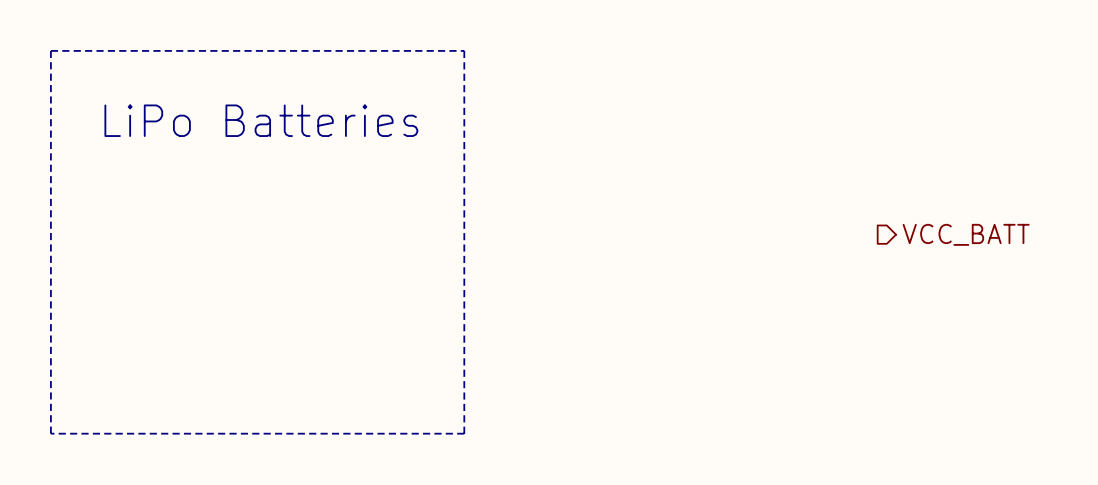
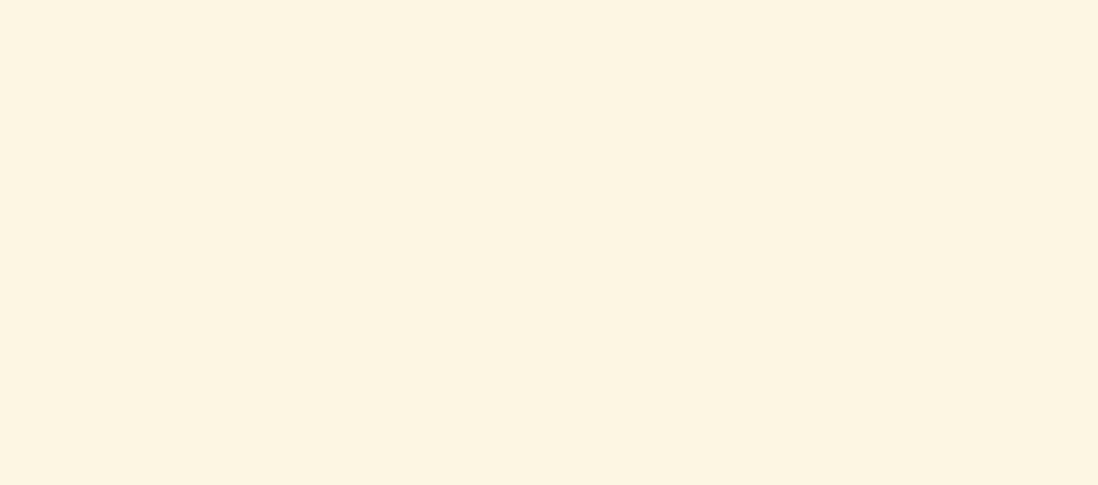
line: (50, 50) (464, 50) (464, 433) (50, 433) (50, 50) -> none
text: LiPo Batteries (261, 120) -> none
hierarchical label: VCC_BATT (966, 234) -> none

